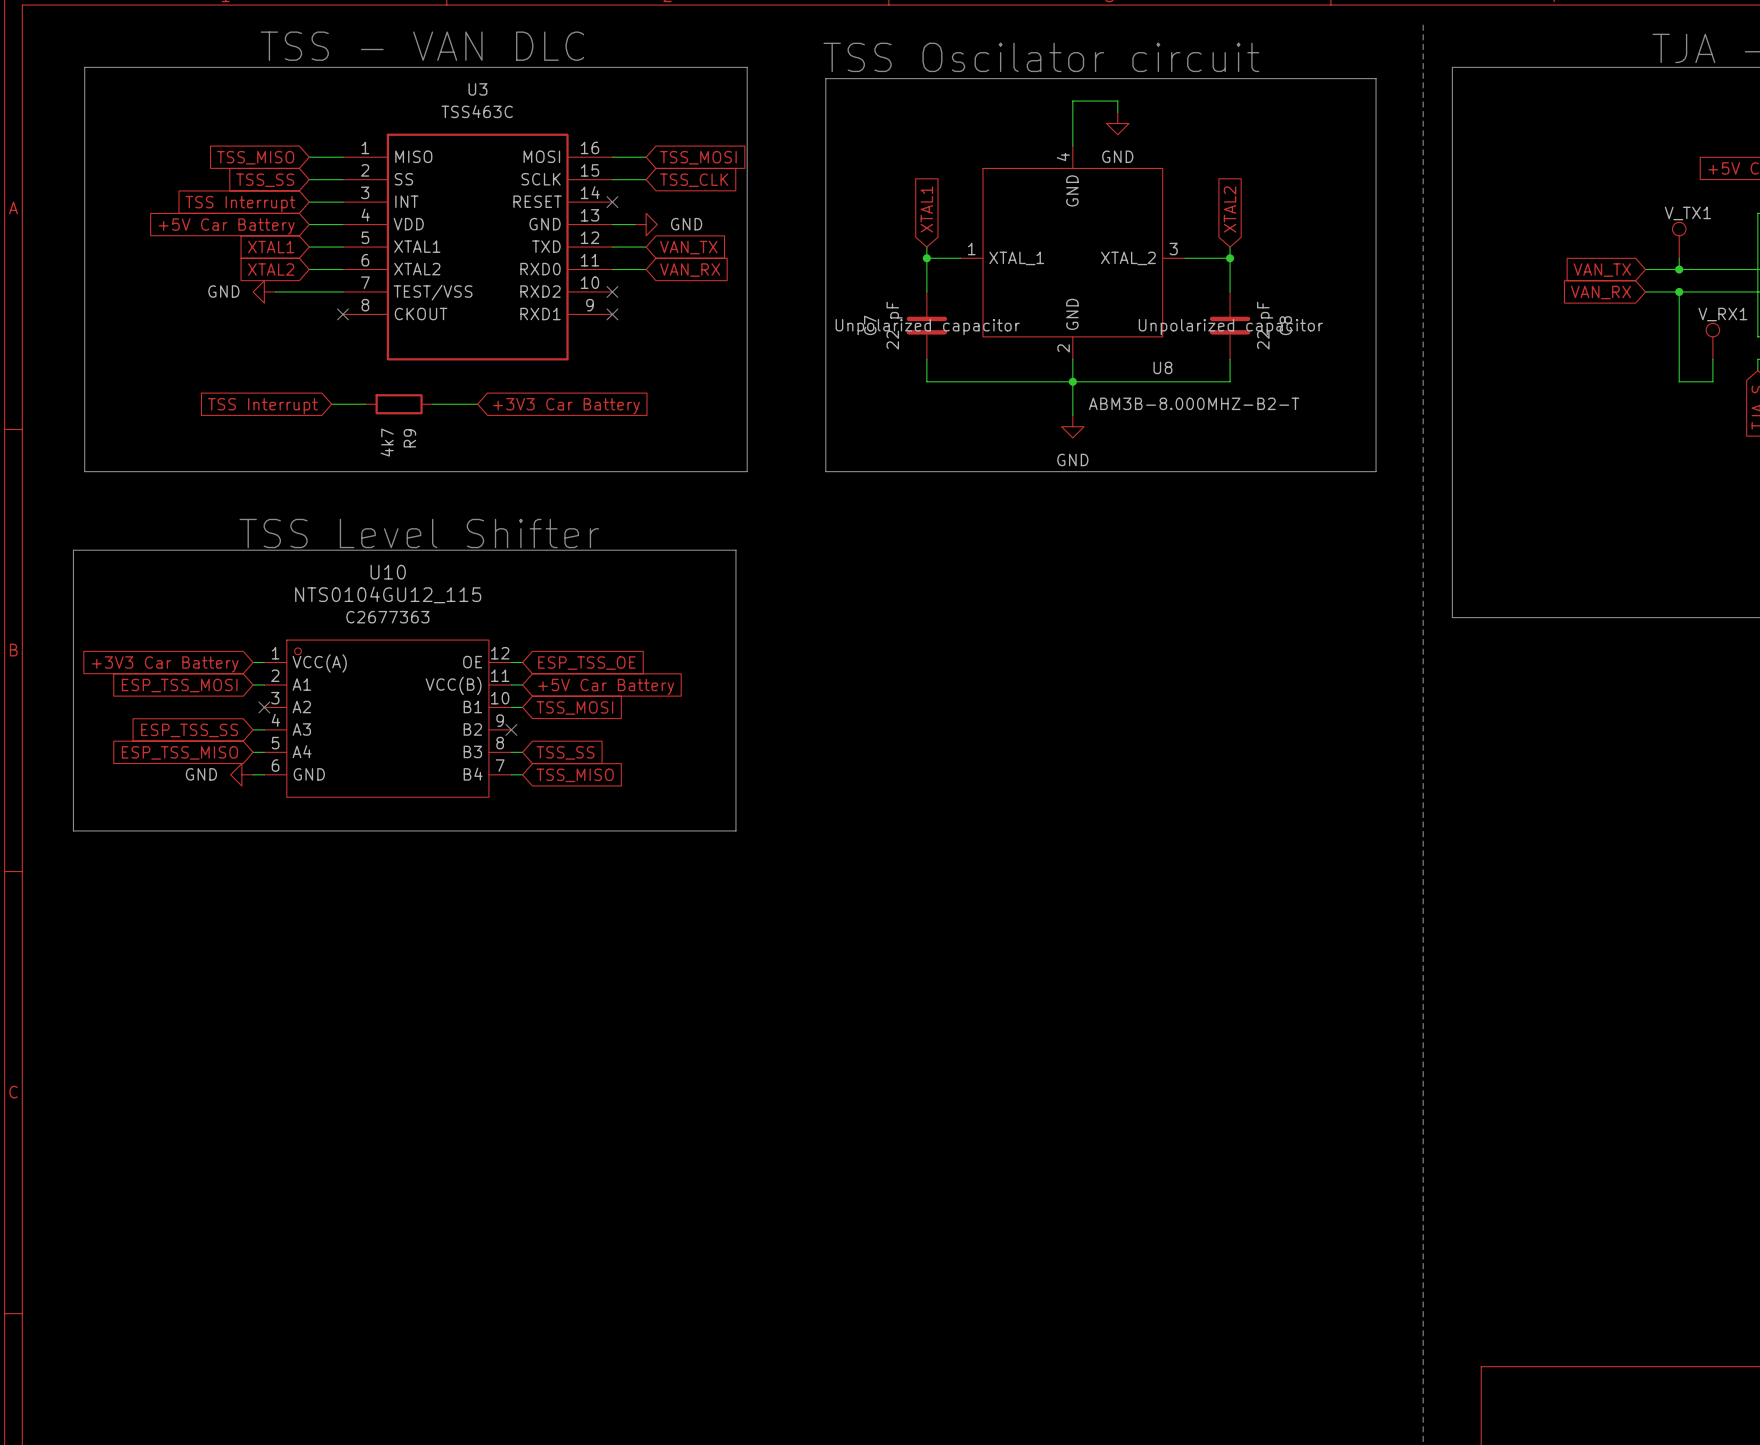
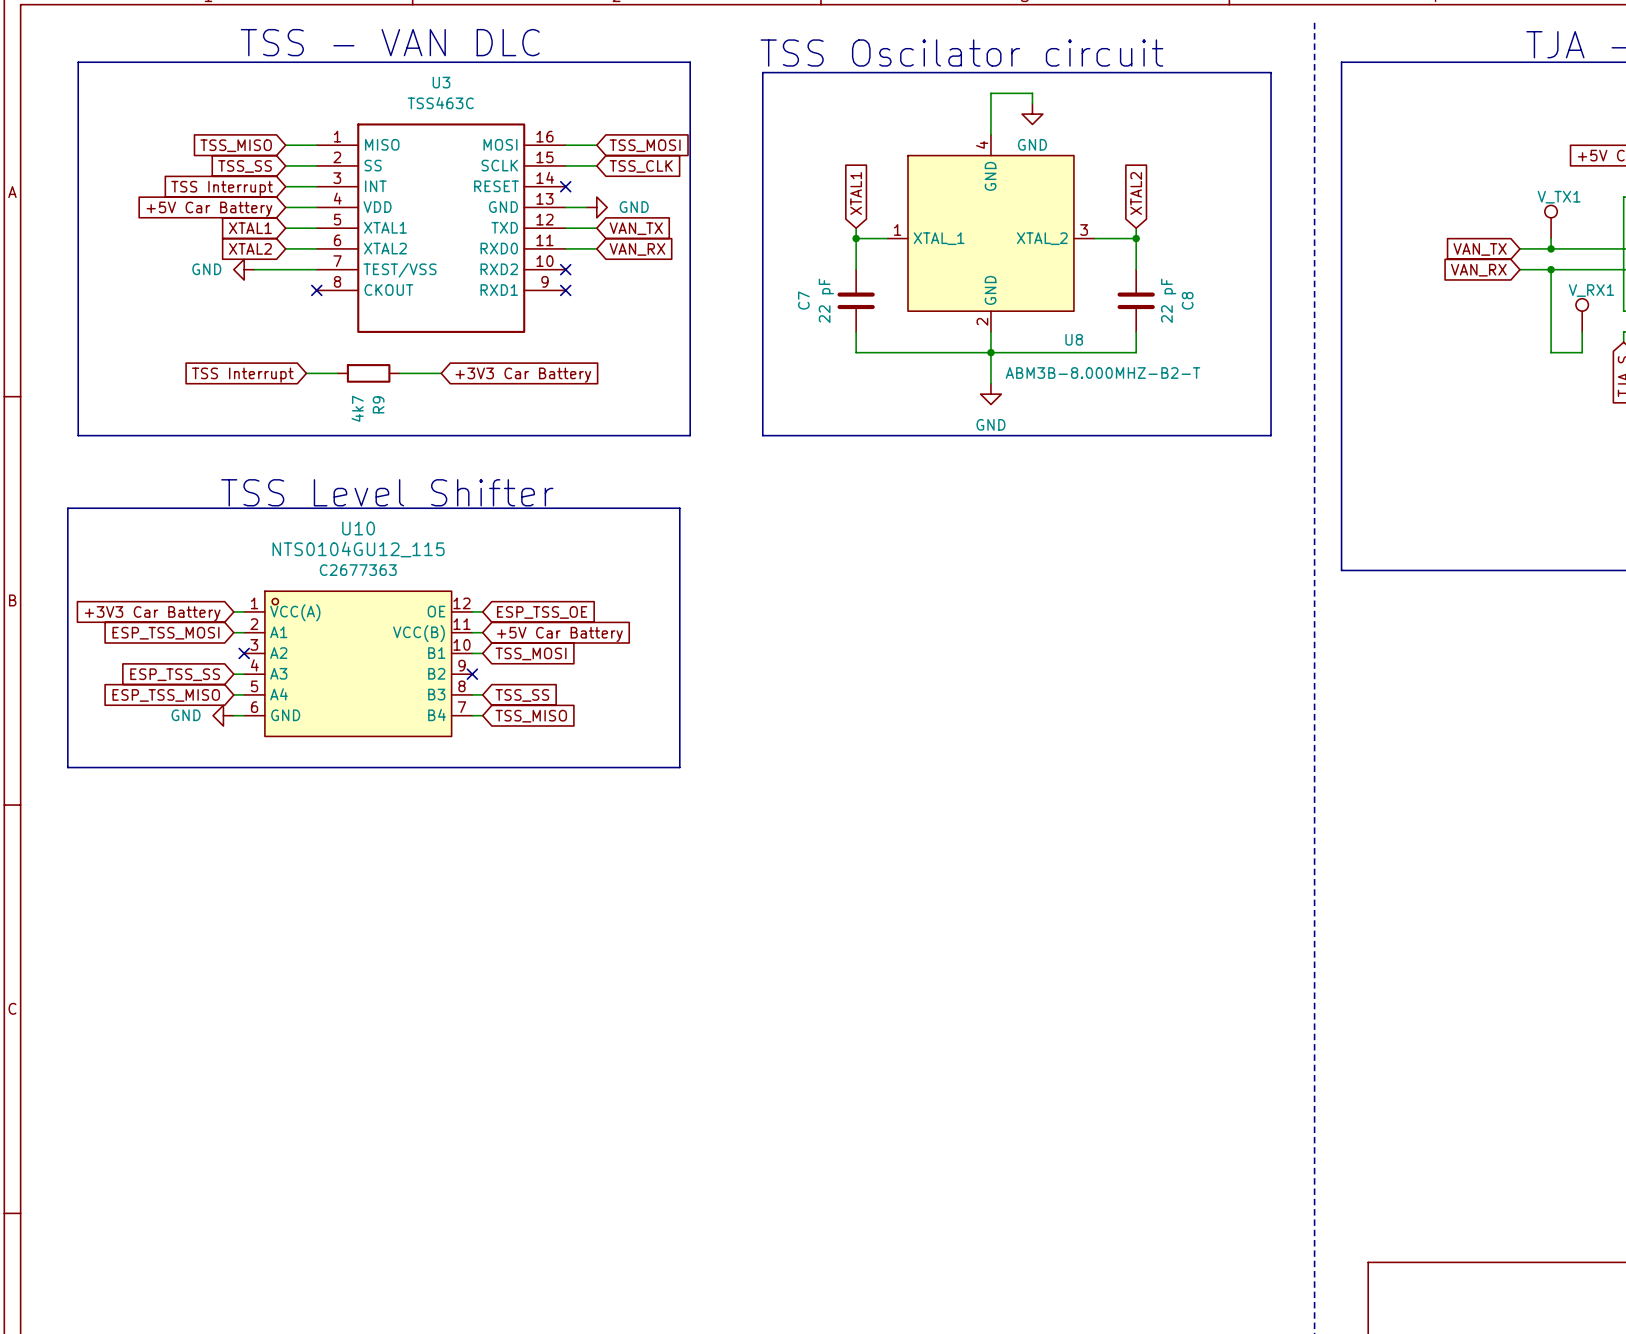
C7 text: Unpolarized capacitor (927, 327) -> none
C8 text: Unpolarized capacitor (1230, 327) -> none

